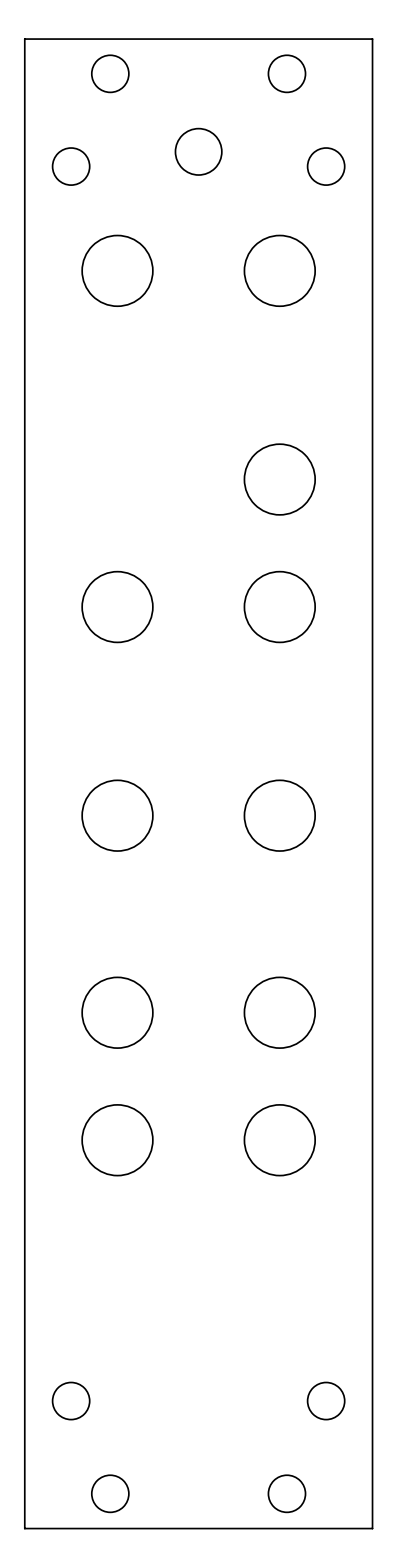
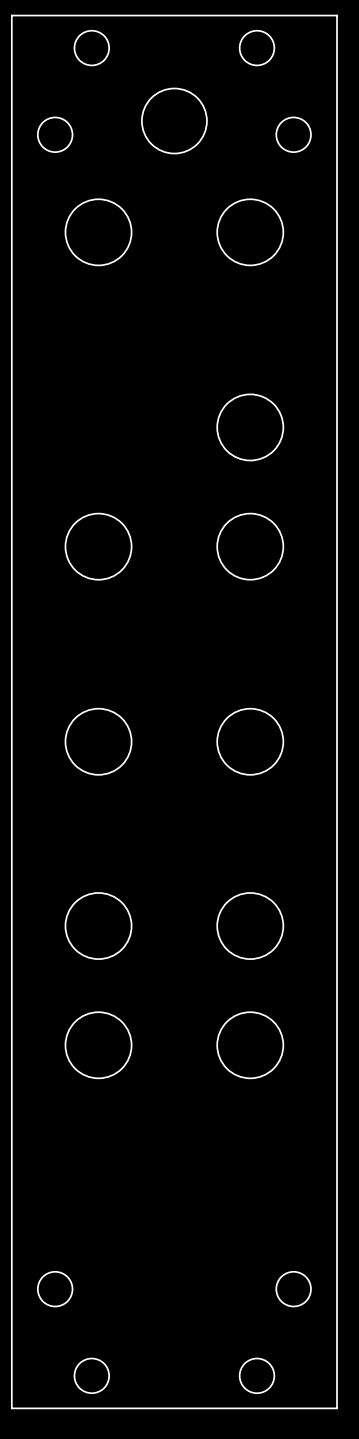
round board edge size: [174, 128, 223, 176] -> [141, 87, 208, 155]

